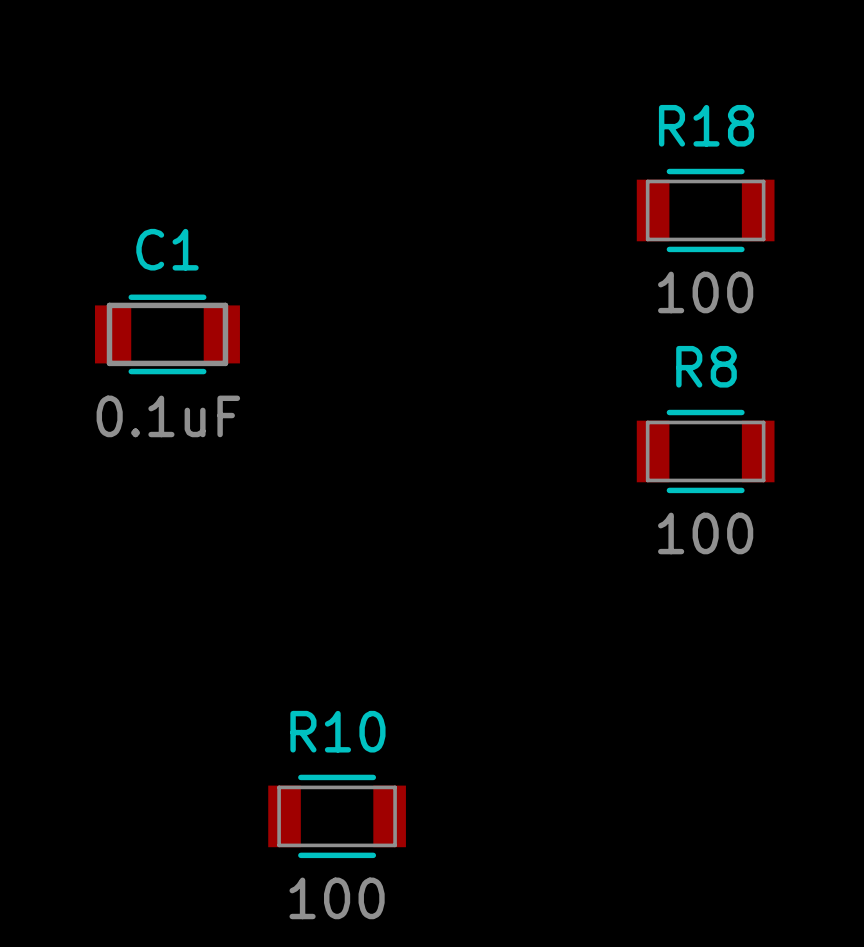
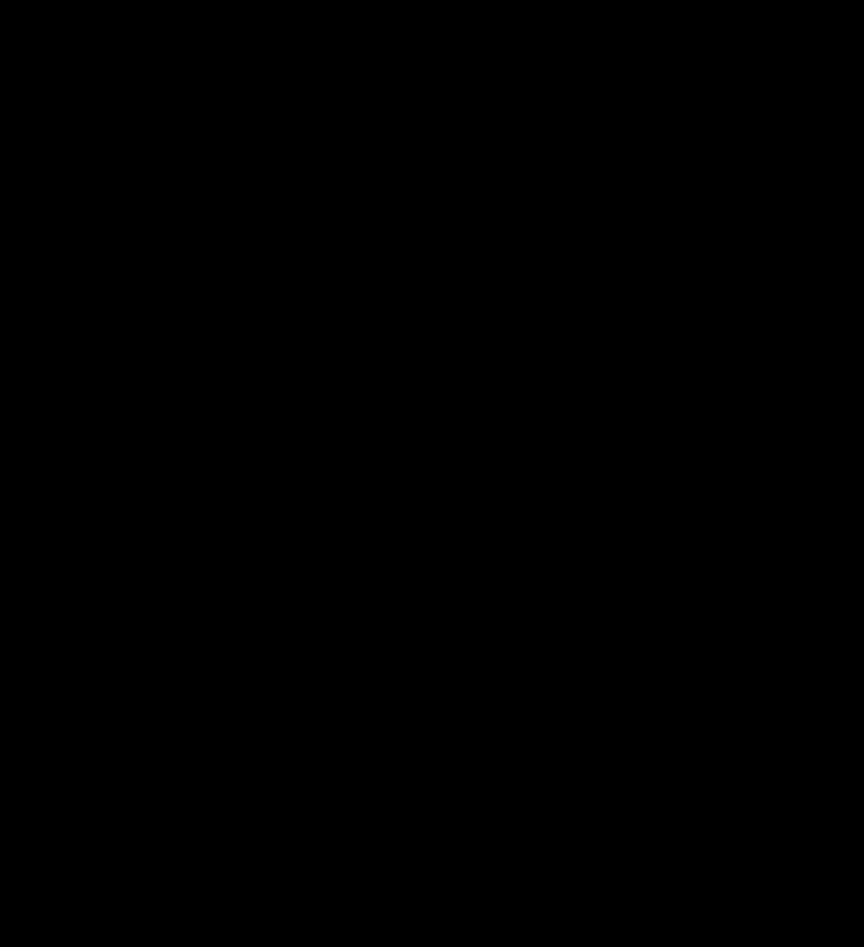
R18: 100 (705, 210) -> none
C1: 0.1uF (167, 334) -> none
R8: 100 (705, 451) -> none
R10: 100 (337, 816) -> none

